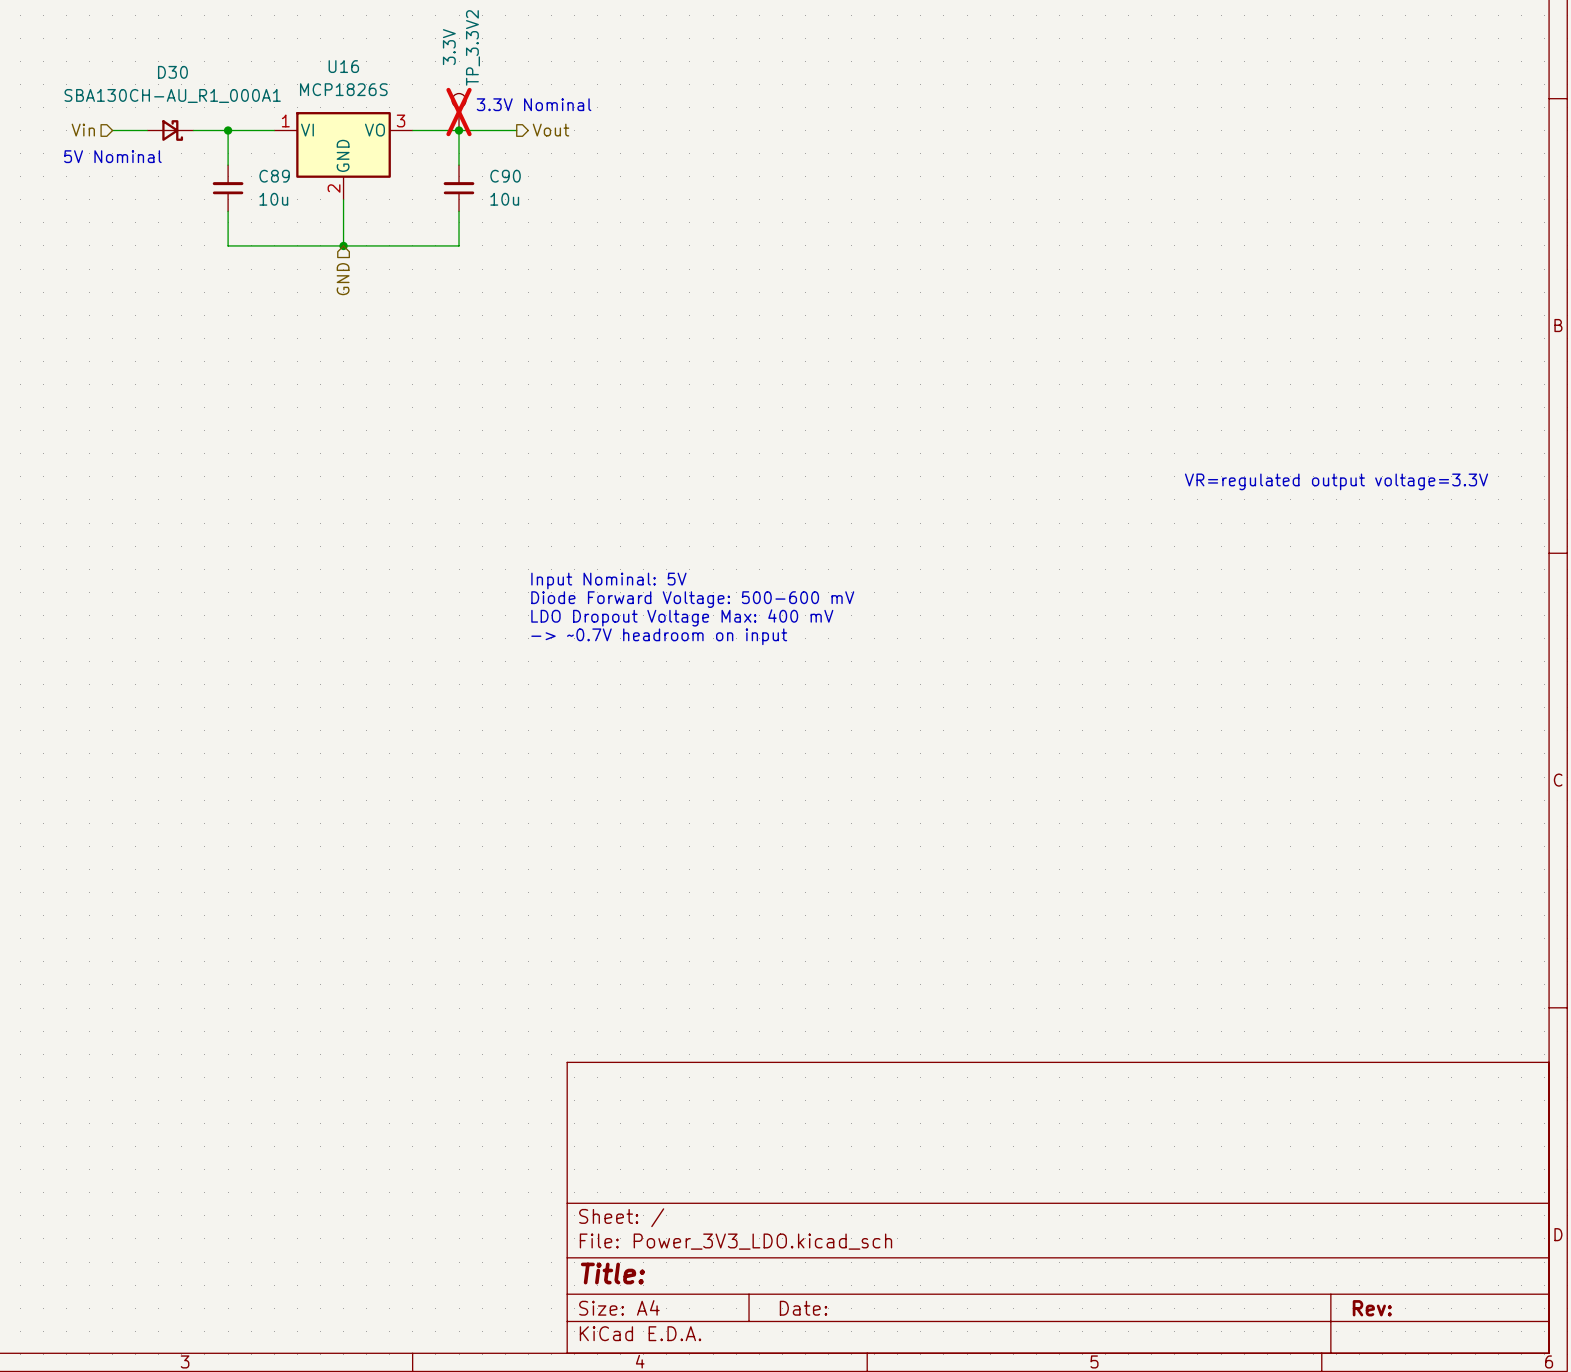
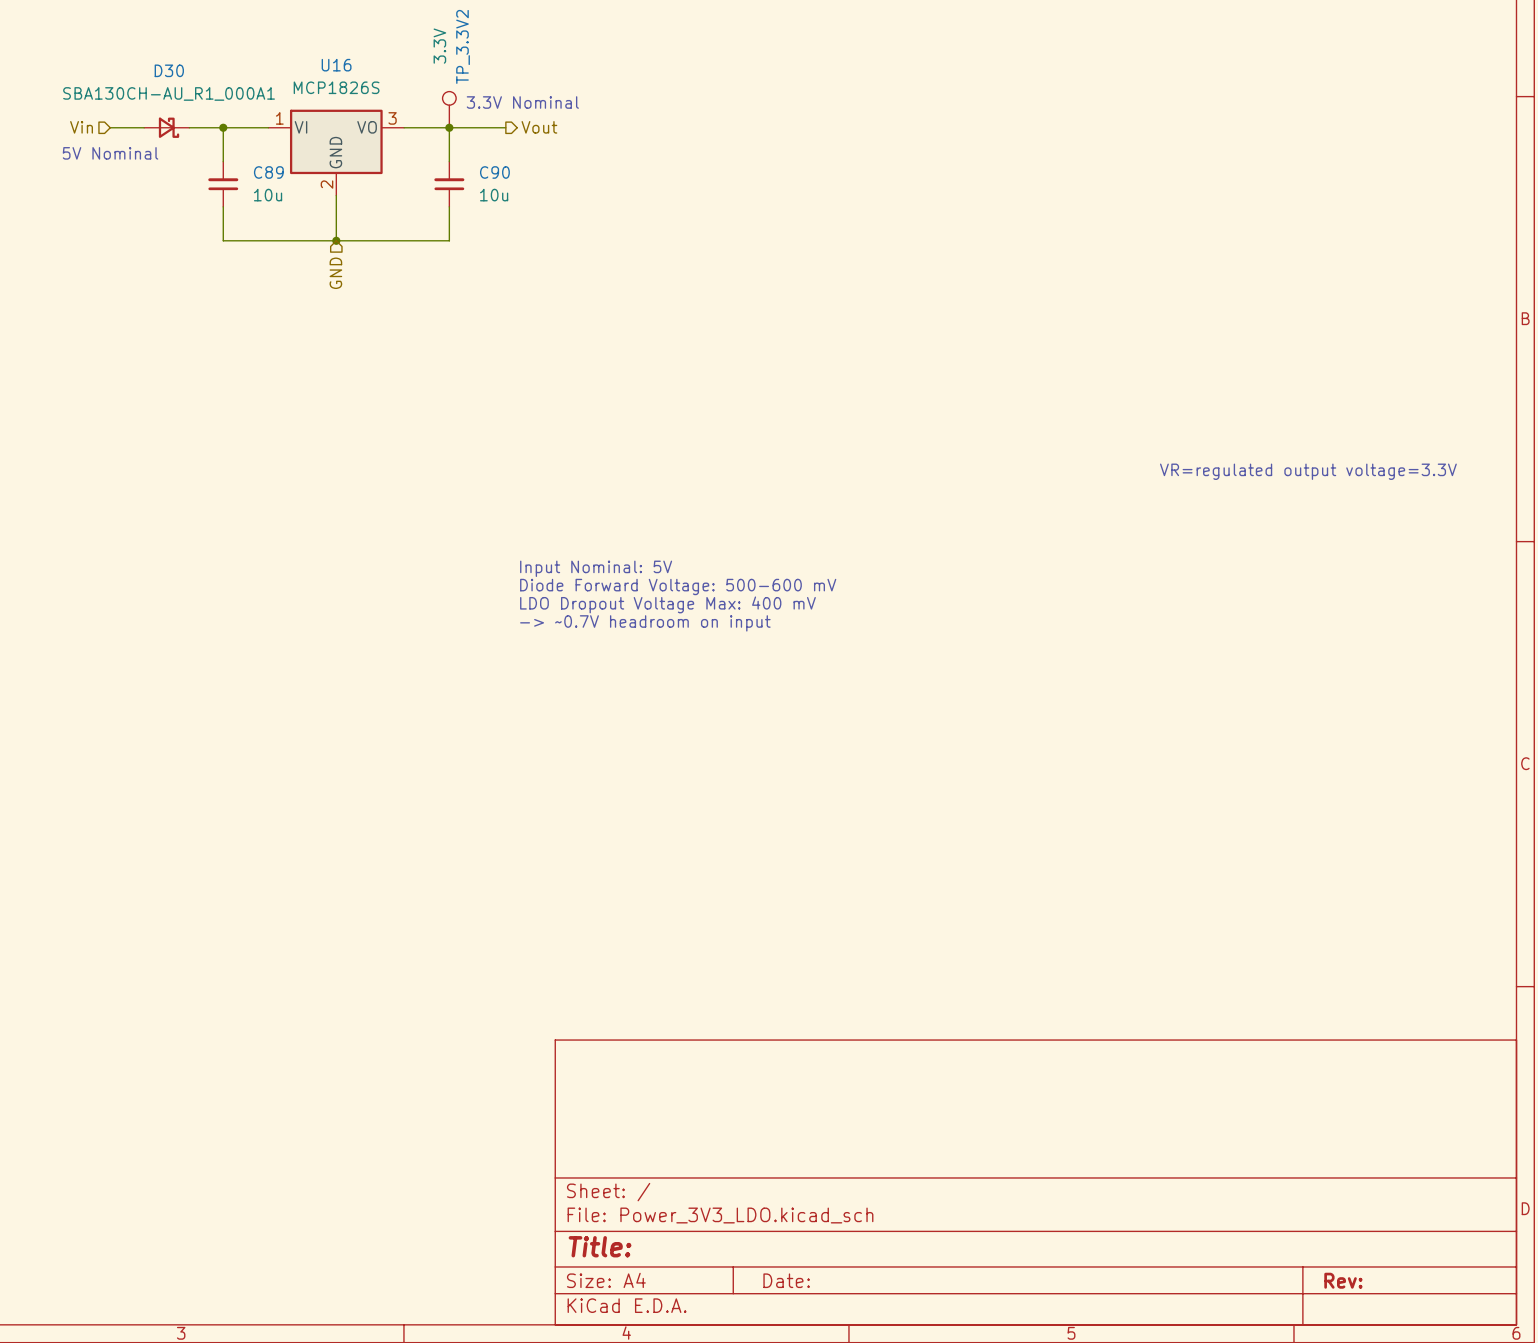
TP_3.3V2 do-not-place cross: (459, 112) -> none

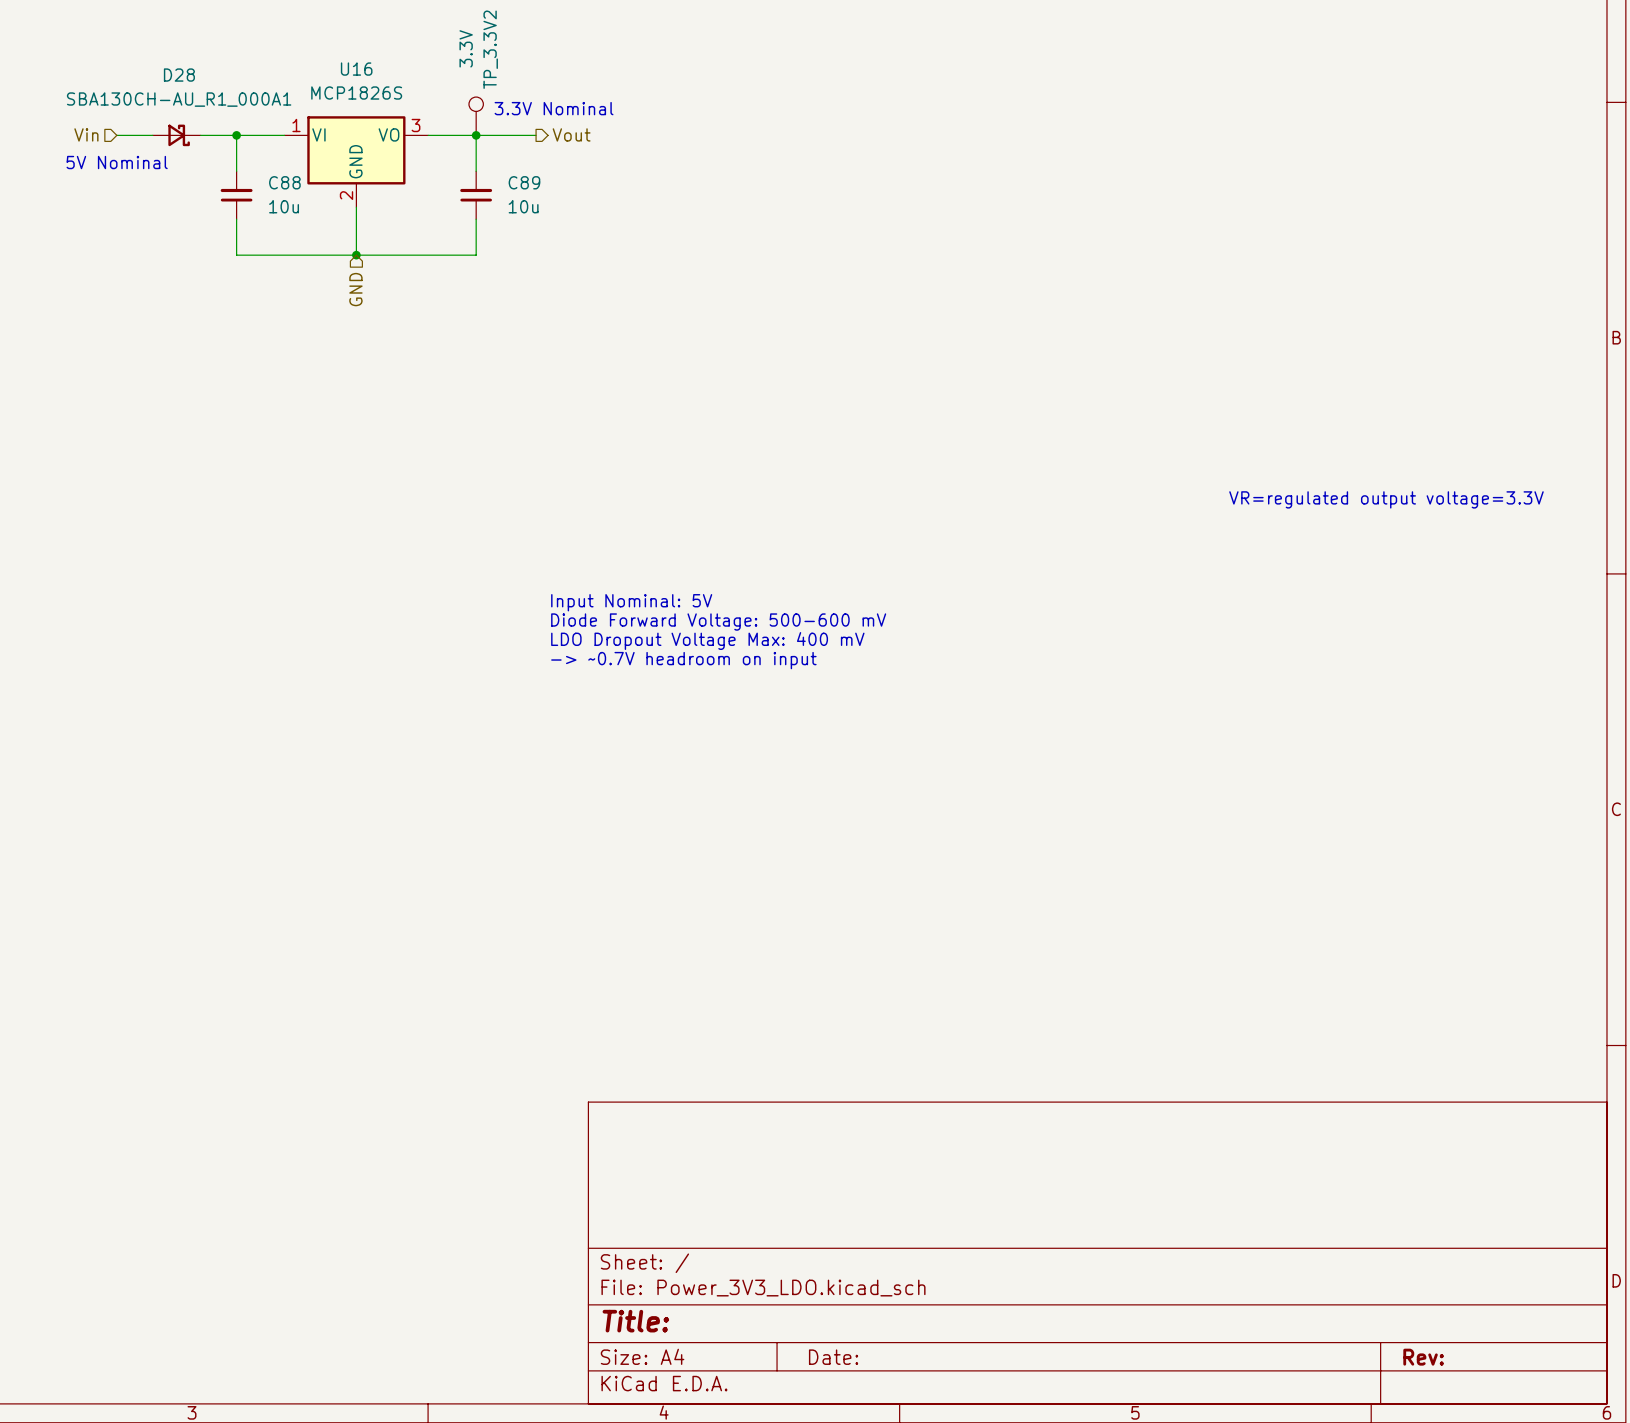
D30 name: D30 (169, 70) -> D28 (179, 75)
C89 name: C89 (268, 172) -> C88 (284, 182)
C90 name: C90 (494, 172) -> C89 (524, 182)

